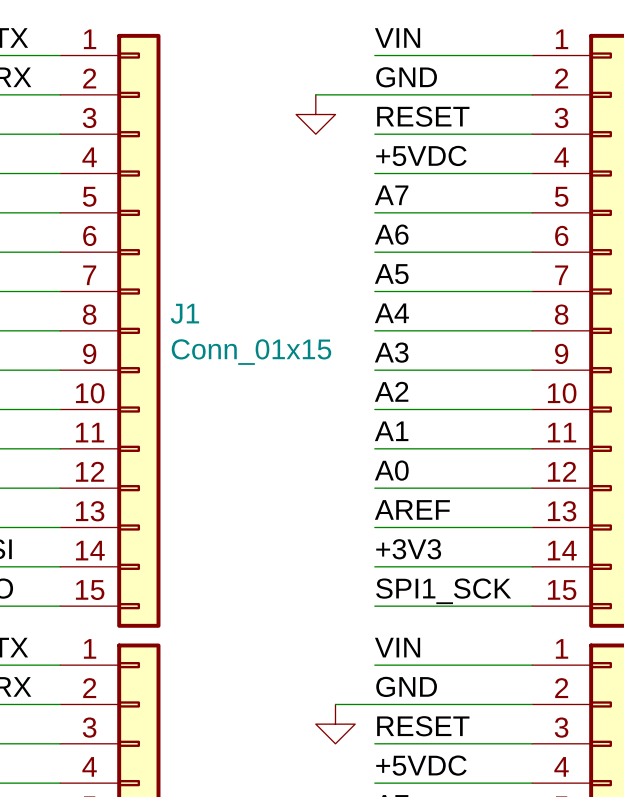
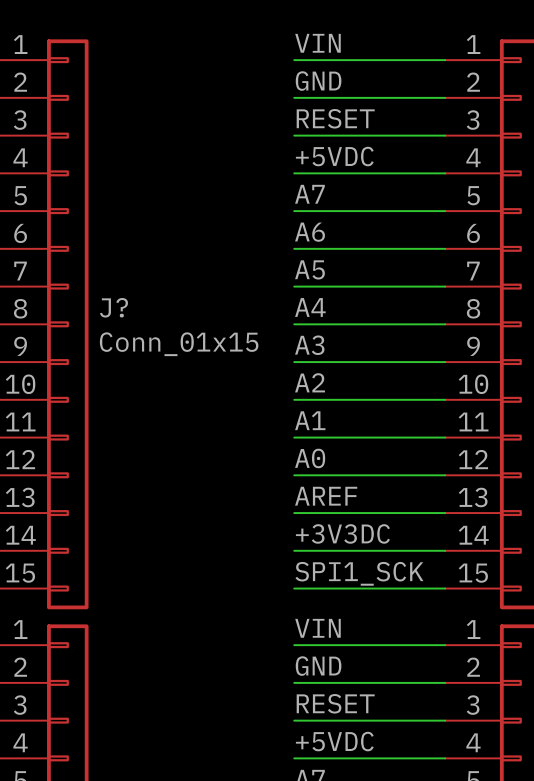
wire: (315, 94) (374, 94) -> none
power symbol: (315, 114) -> none
J1 name: J1 (184, 313) -> J? (113, 307)
label: +3V3 (408, 549) -> +3V3DC (342, 533)
wire: (335, 704) (374, 704) -> none
power symbol: (335, 724) -> none

